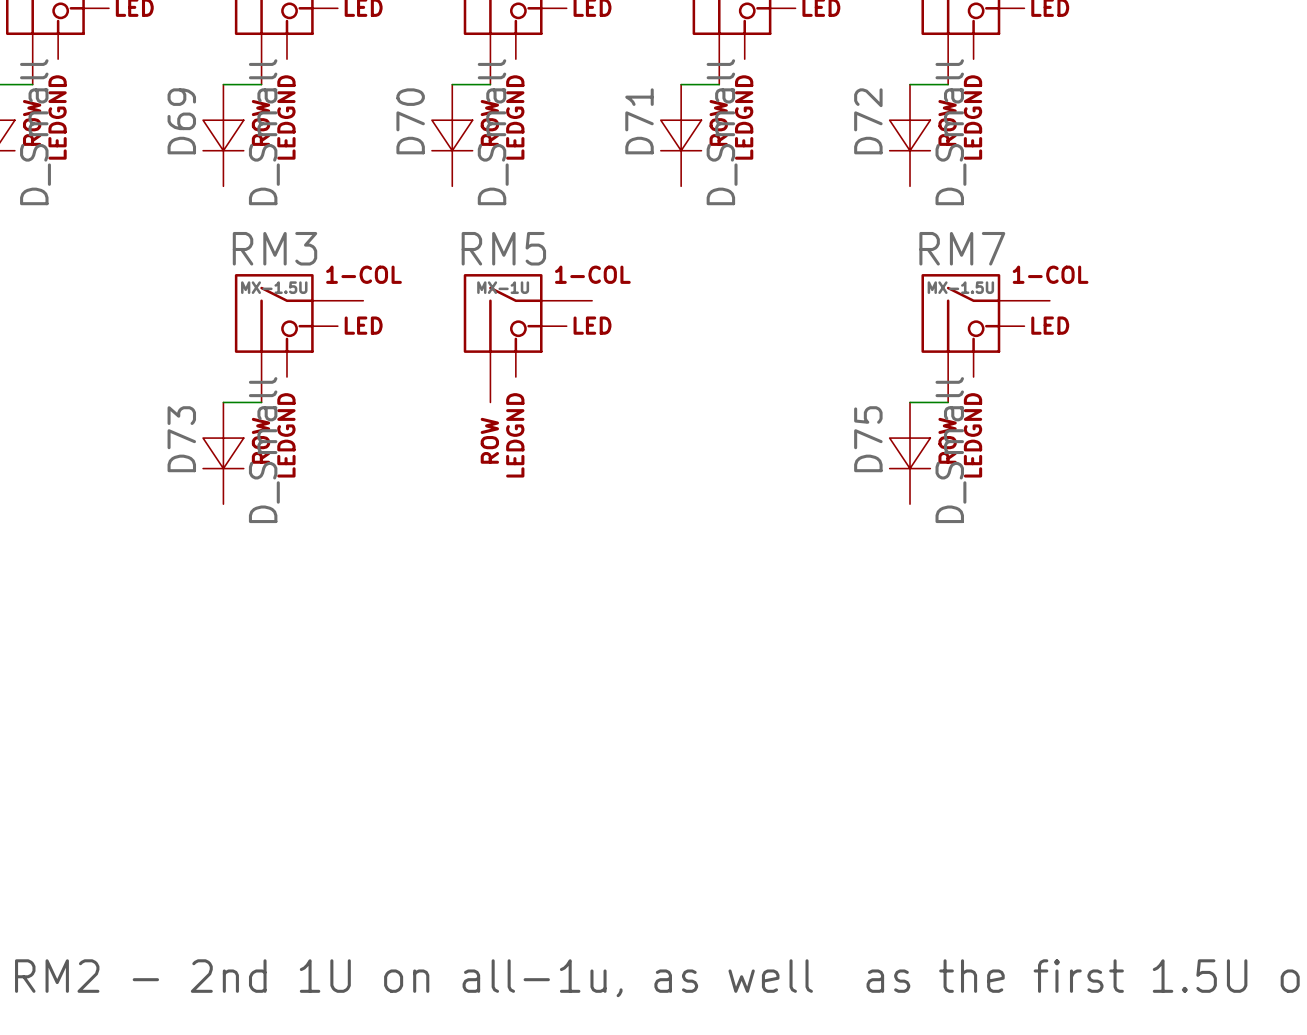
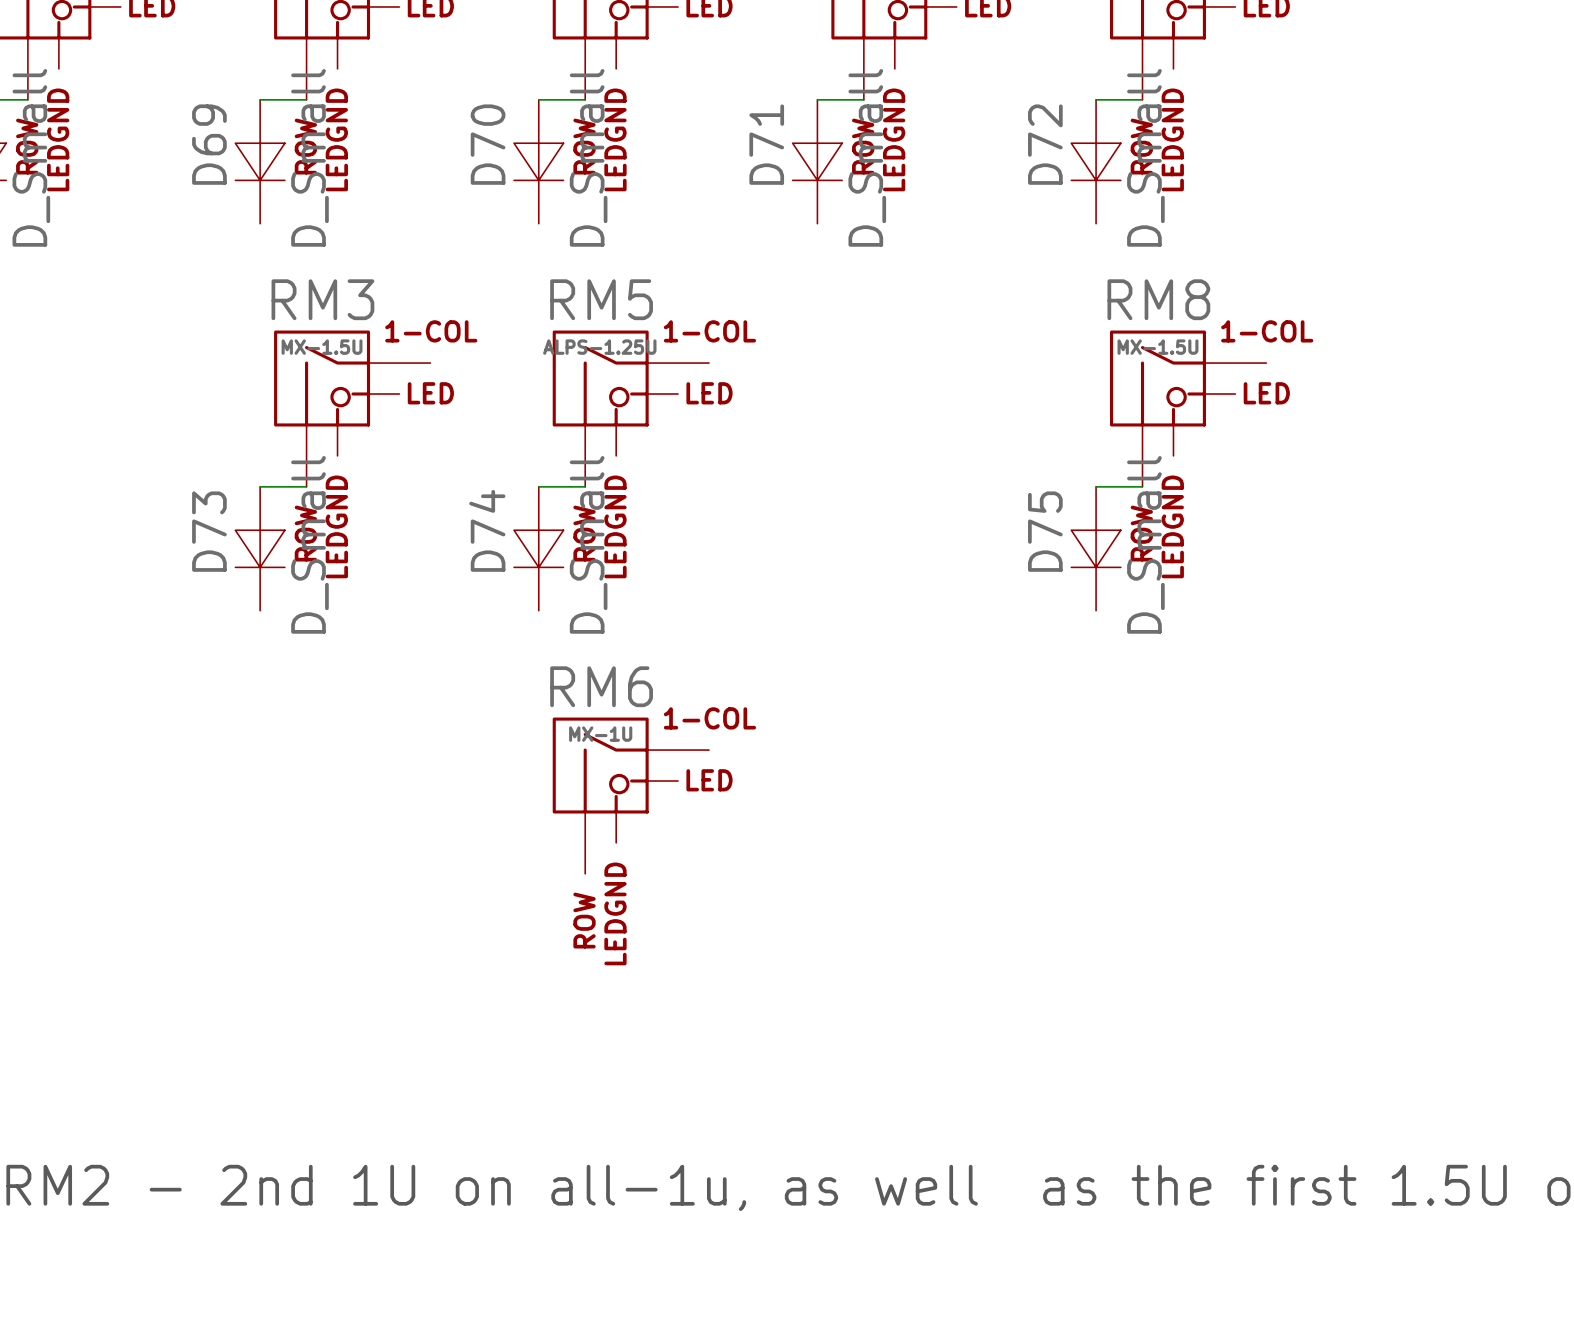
RM7 name: RM7 (962, 248) -> RM8 (1158, 299)
RM5 value: MX-1U (503, 287) -> ALPS-1.25U (599, 347)
wire: none -> (538, 486) (585, 486)
D74: none -> D_Small (538, 548)
RM6: none -> MX-1U (630, 795)

